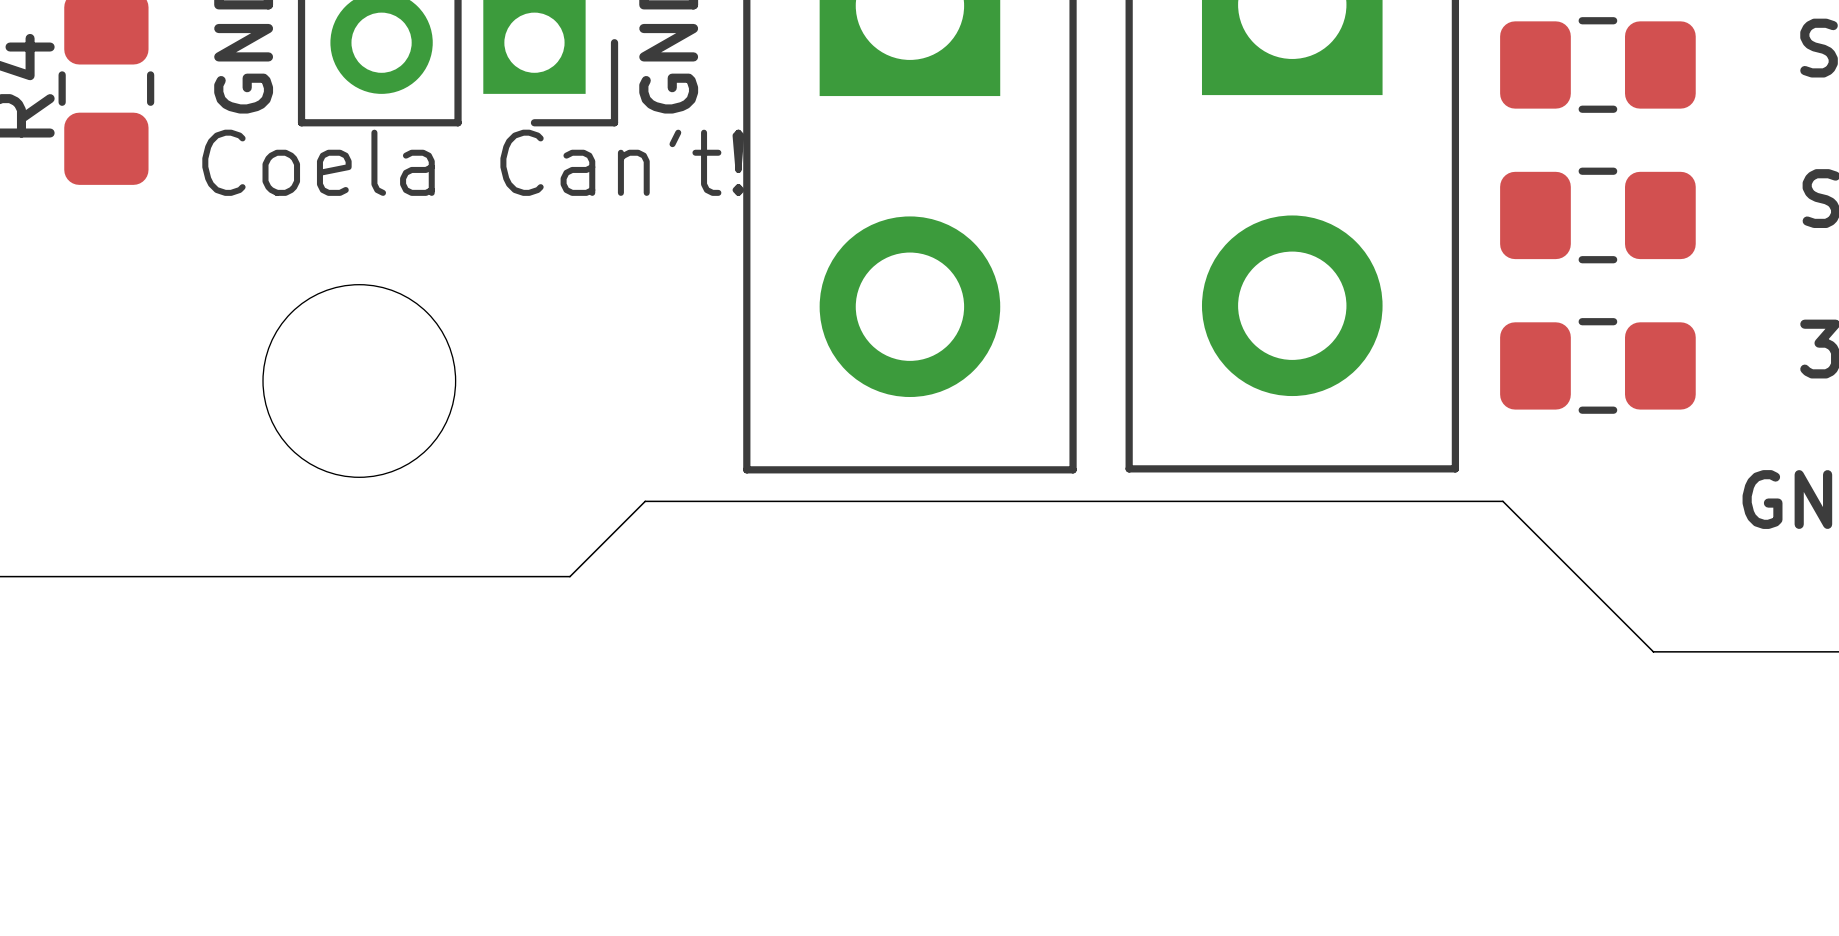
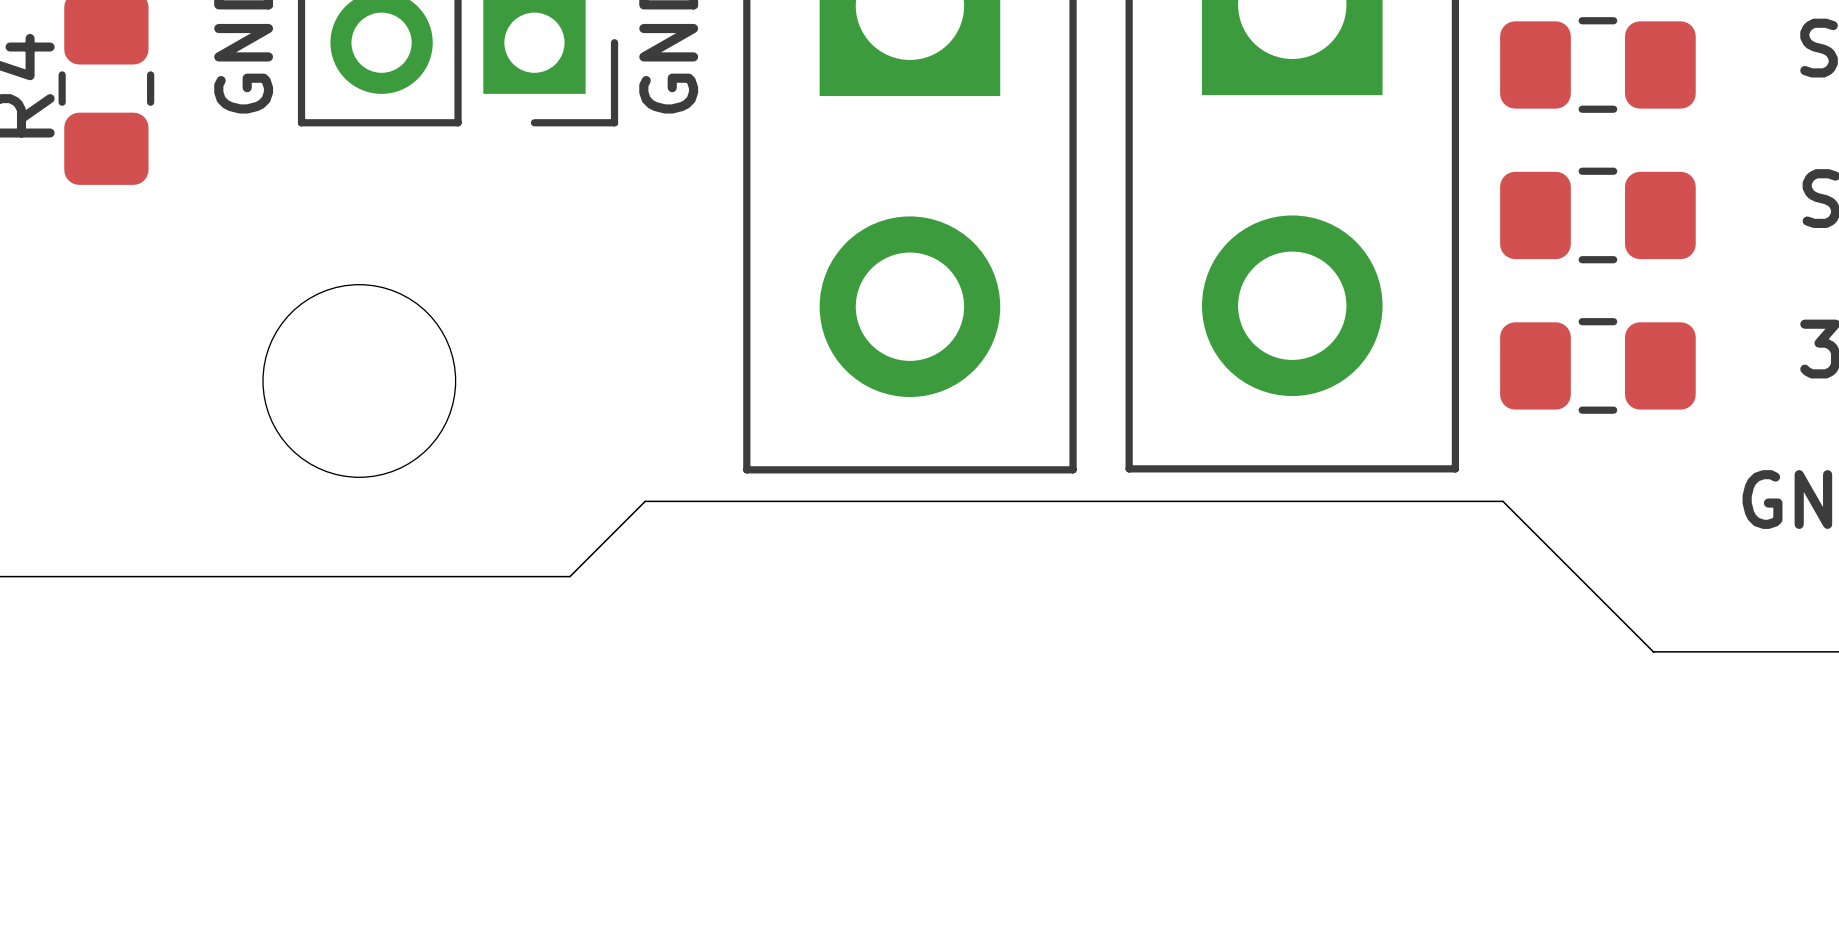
text: Coela Can't! (473, 162) -> none

